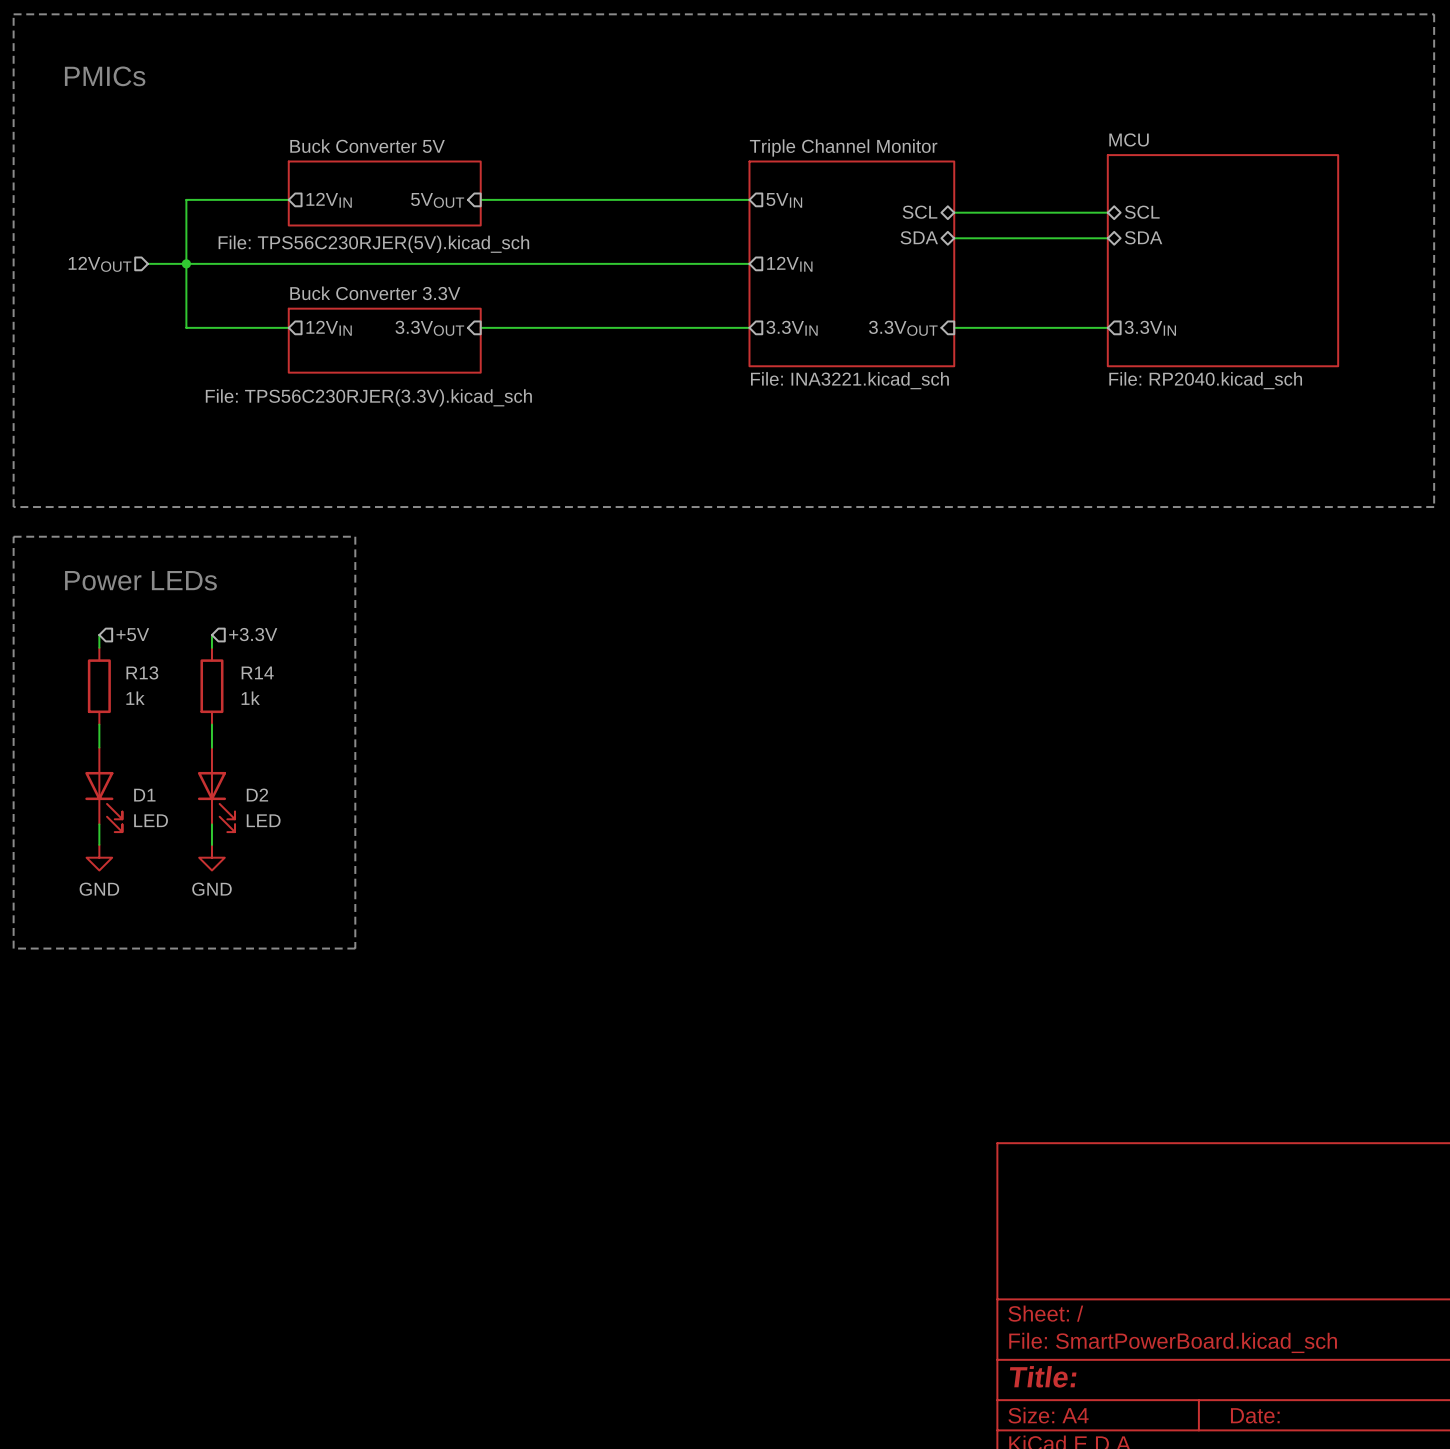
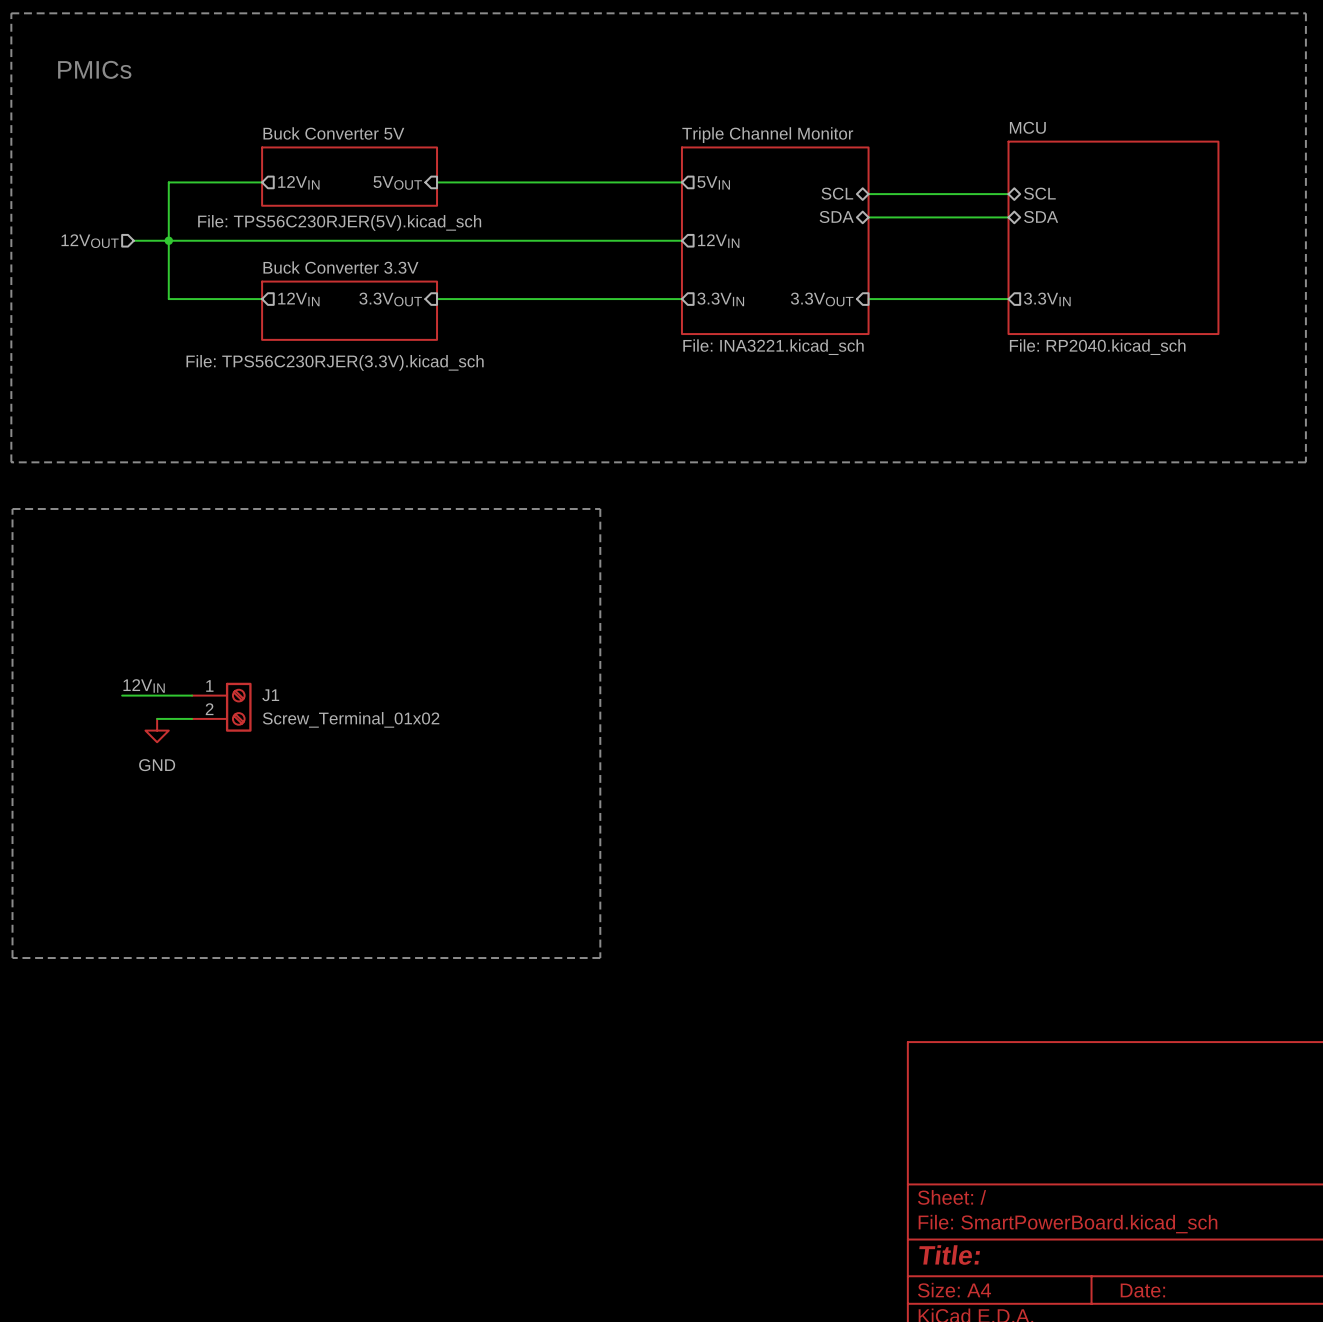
line: (13, 536) (355, 536) (355, 948) (13, 948) (13, 536) -> none
line: none -> (12, 508) (600, 508) (600, 958) (12, 958) (12, 508)
text: Power LEDs (140, 580) -> none
hierarchical label: +5V (132, 634) -> none
hierarchical label: +3.3V (253, 634) -> none
wire: (99, 635) (99, 647) -> none
wire: (211, 635) (211, 647) -> none
R13: 1k (99, 686) -> none
R14: 1k (211, 686) -> none
wire: (99, 724) (99, 747) -> none
wire: (211, 724) (211, 747) -> none
label: none -> 12VIN (144, 685)
wire: none -> (122, 695) (192, 695)
J1: none -> Screw_Terminal_01x02 (221, 707)
wire: none -> (157, 718) (192, 718)
D1: LED (103, 789) -> none
D2: LED (216, 789) -> none
power symbol: none -> GND (157, 730)
wire: (99, 824) (99, 844) -> none
wire: (211, 824) (211, 844) -> none
power symbol: GND (99, 857) -> none
power symbol: GND (211, 857) -> none

